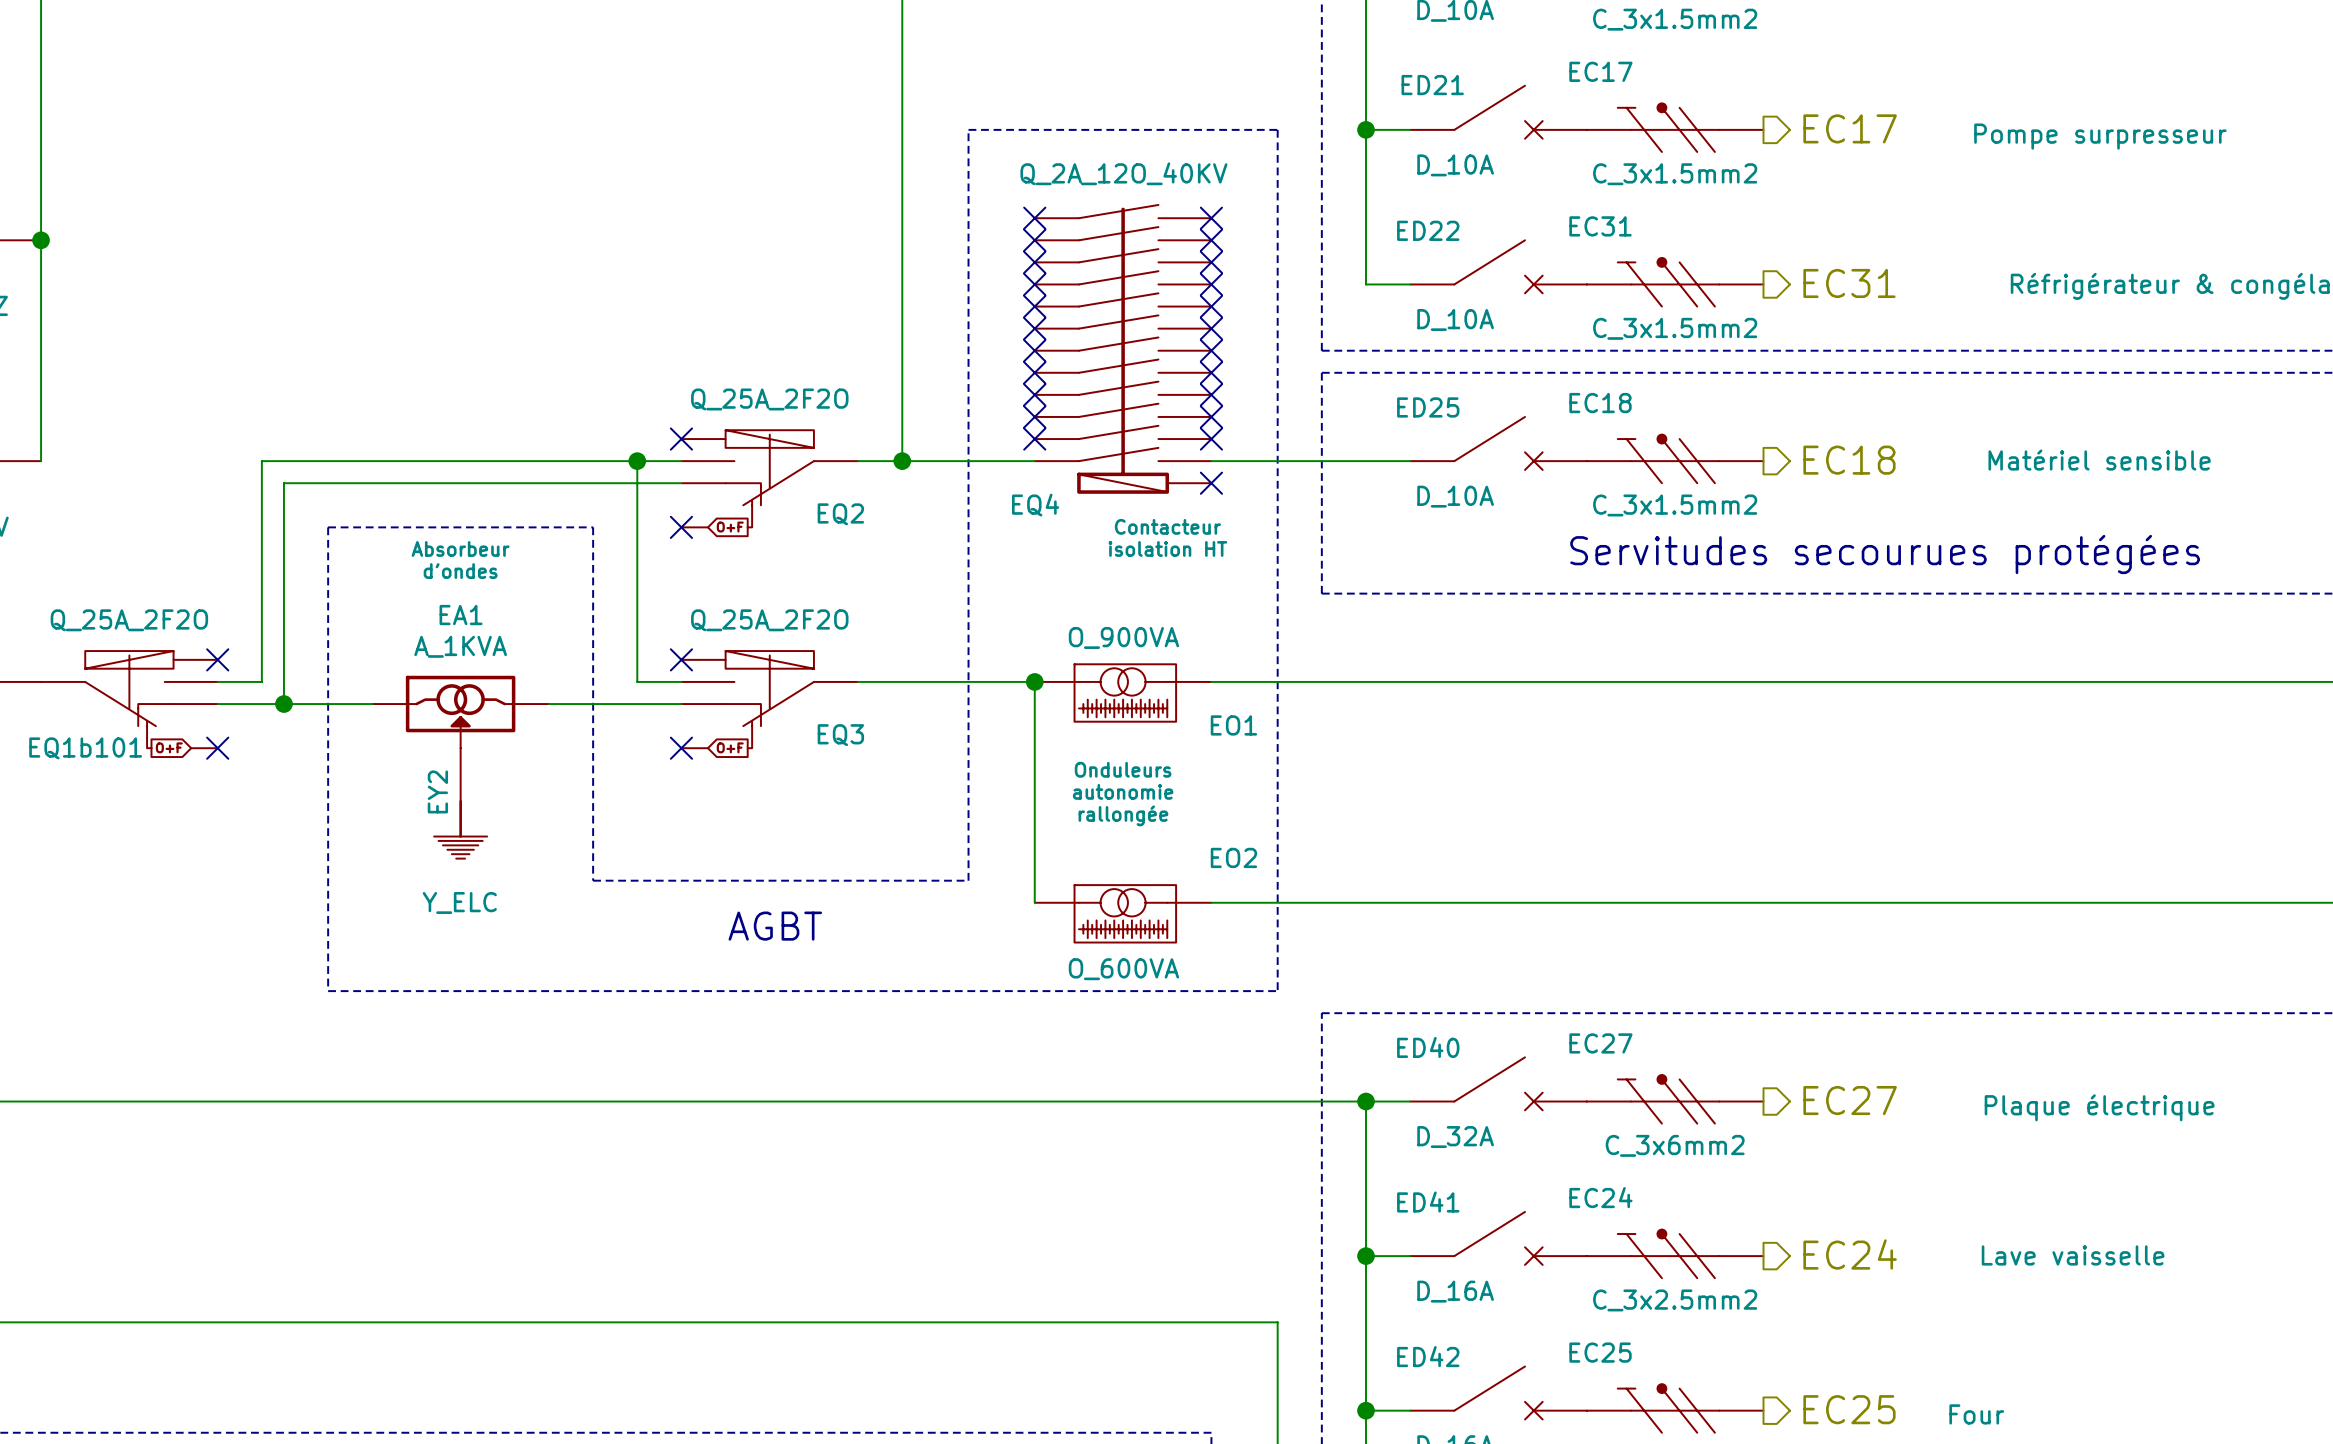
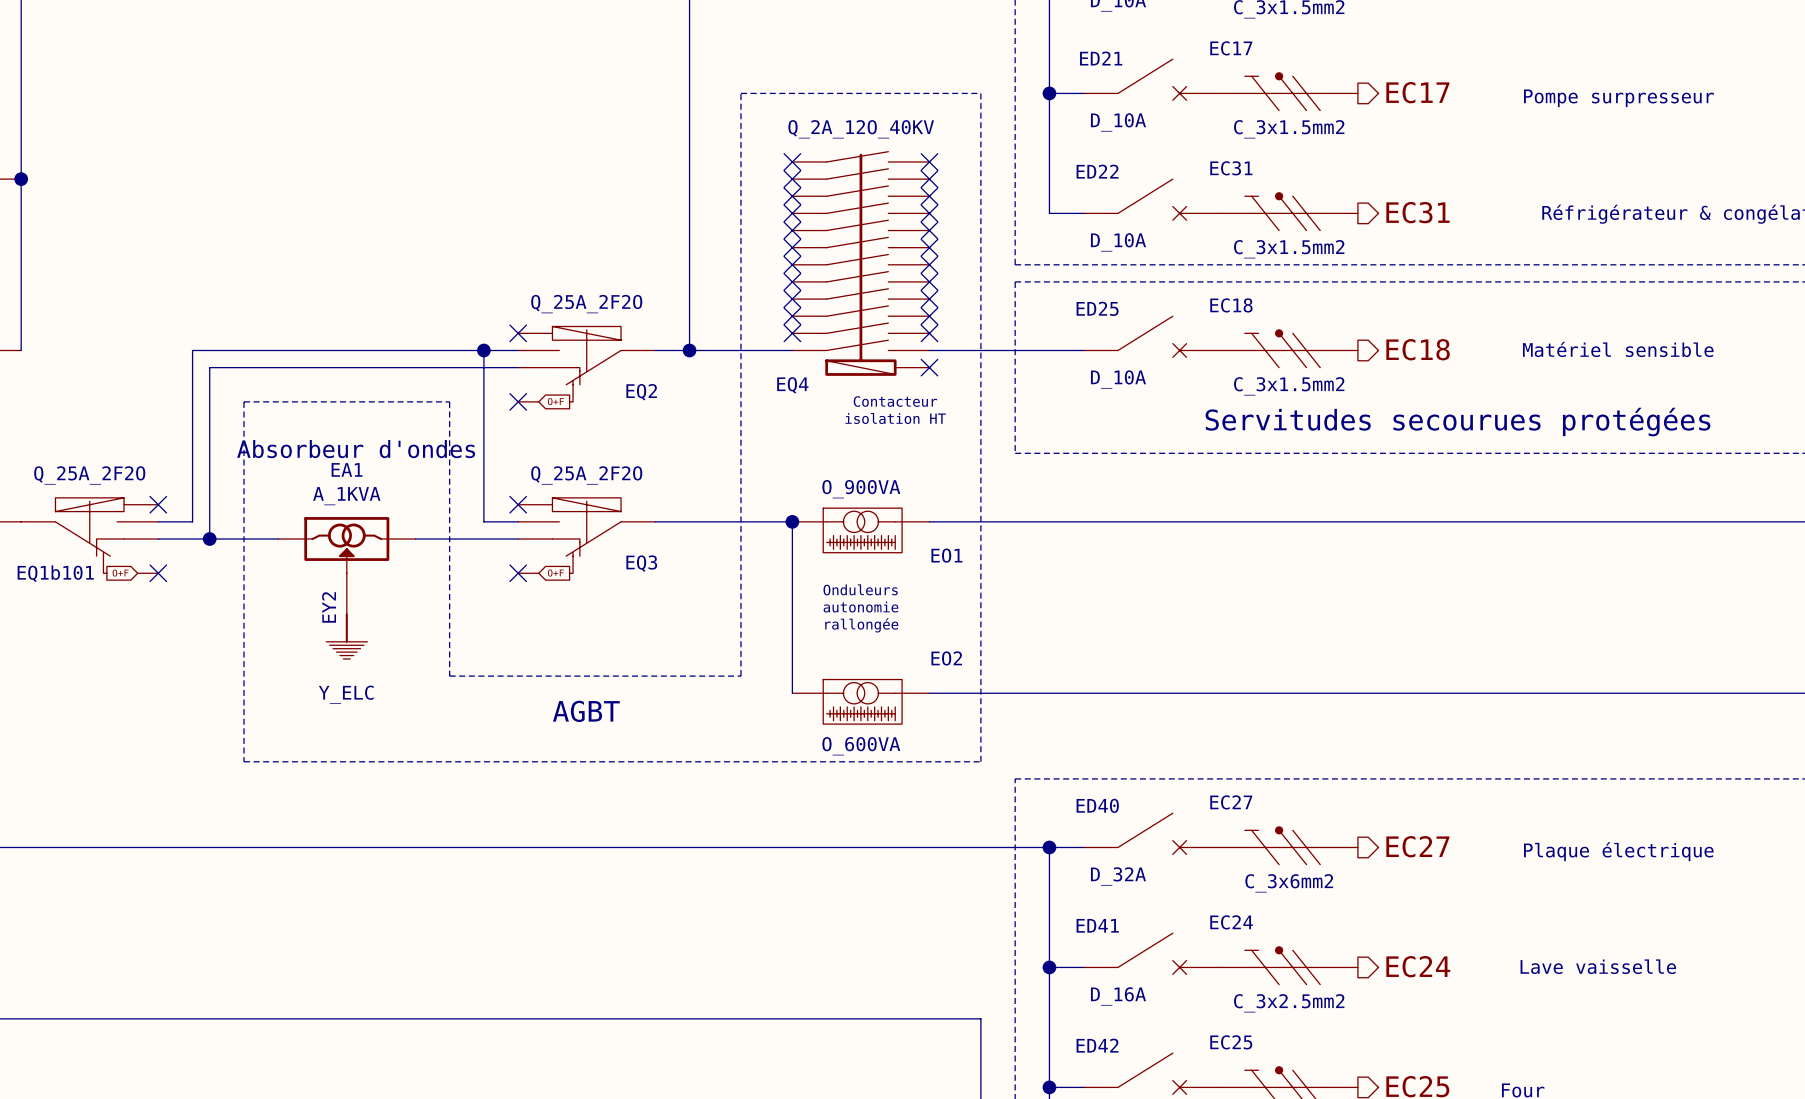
EA1 text: Absorbeur (460, 548) -> none
EA1 text: d'ondes (460, 571) -> none
EA1 text: none -> Absorbeur d'ondes (356, 449)

